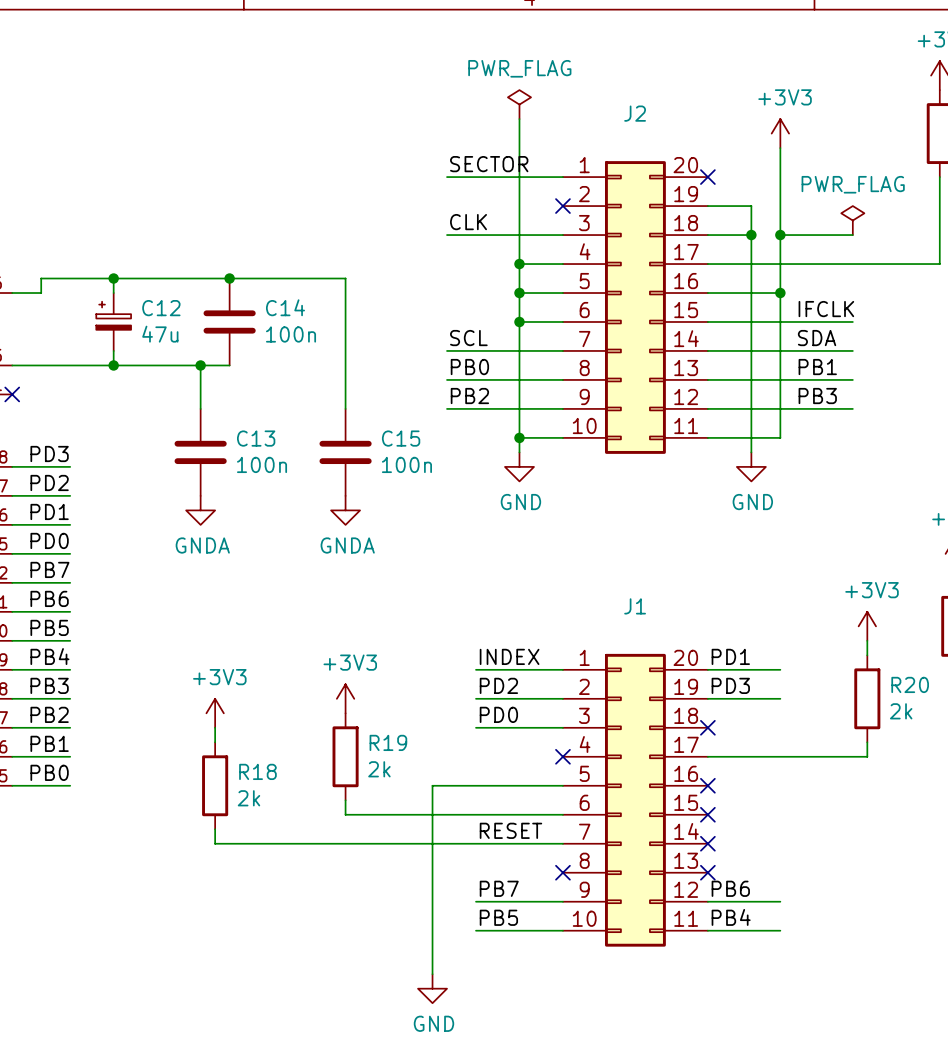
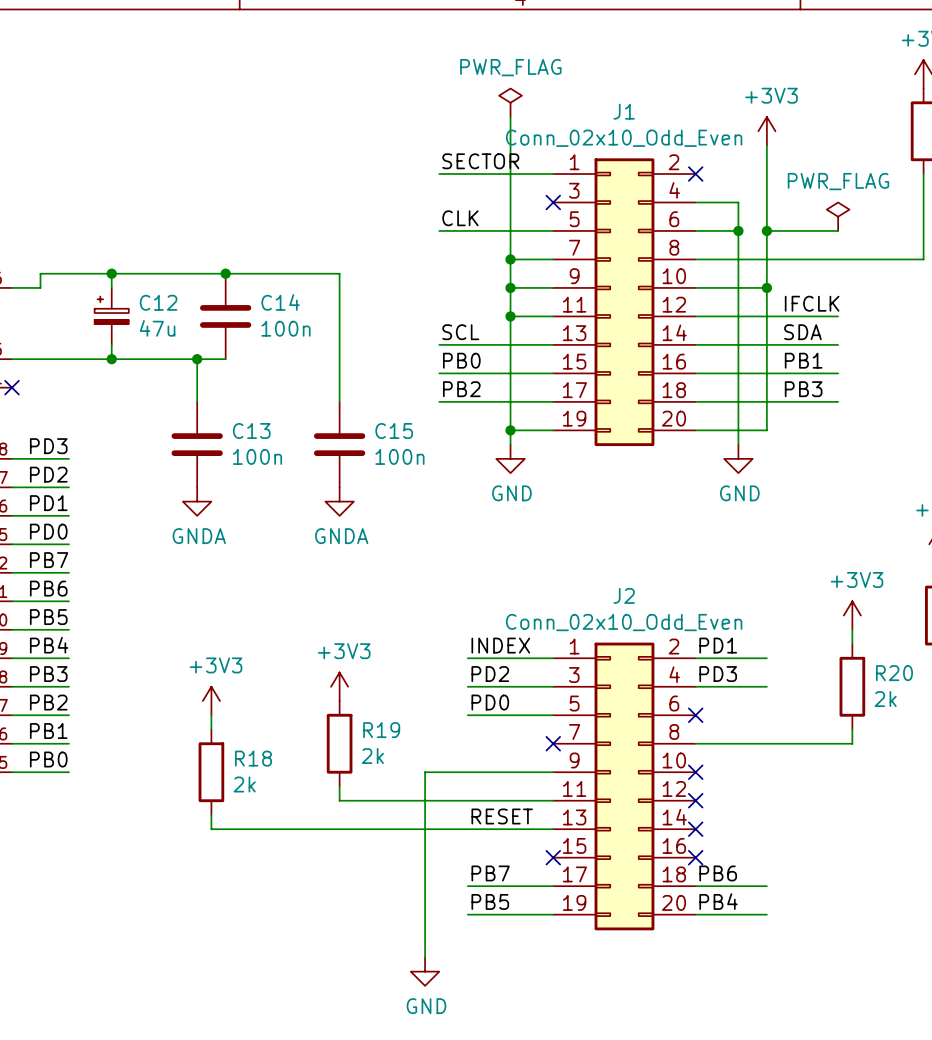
J1 value: none -> Conn_02x10_Odd_Even (624, 138)
J2 symbol: [562, 161, 708, 454] -> [553, 642, 696, 931]
J2 value: none -> Conn_02x10_Odd_Even (624, 622)
J1 symbol: [562, 653, 708, 947] -> [553, 158, 696, 447]

